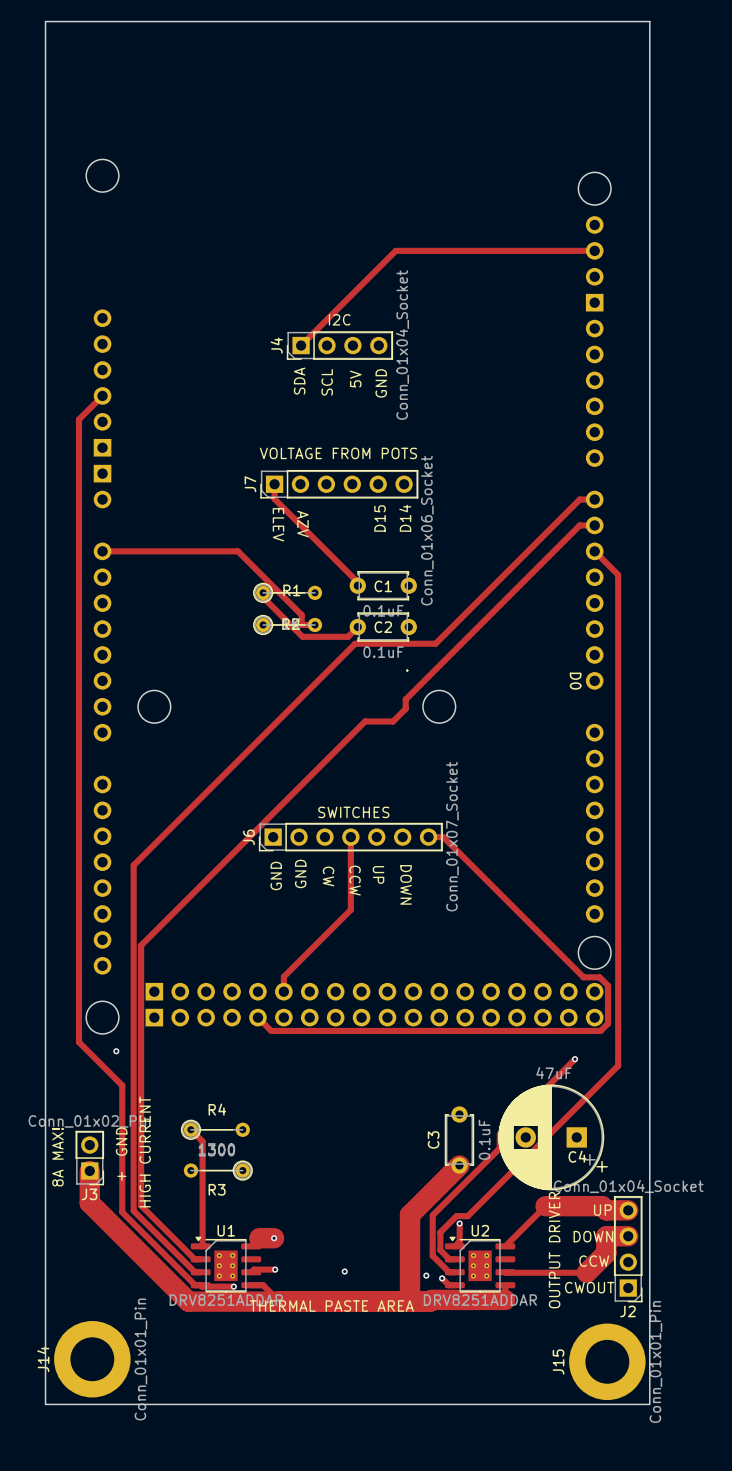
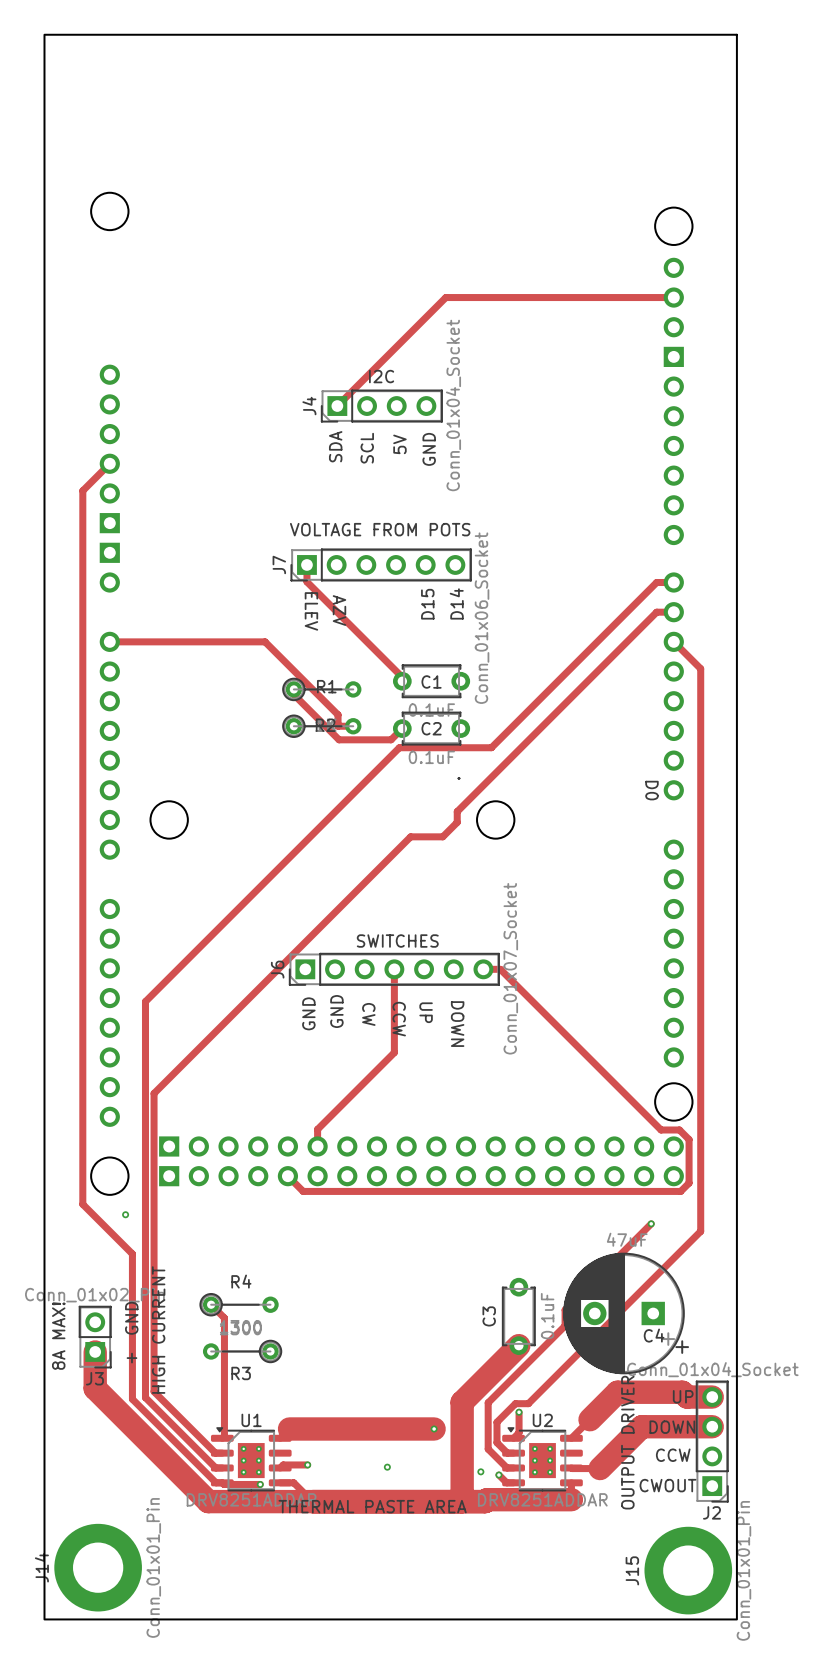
track width: thin (545, 1206) (521, 1230) -> thick (617, 1392) (590, 1419)
track: (606, 1236) (606, 1253) (586, 1272) (530, 1272) -> (687, 1426) (641, 1426) (600, 1468)
track: none -> (306, 1428) (434, 1428)
via: (274, 1238) -> none
via: none -> (434, 1428)

